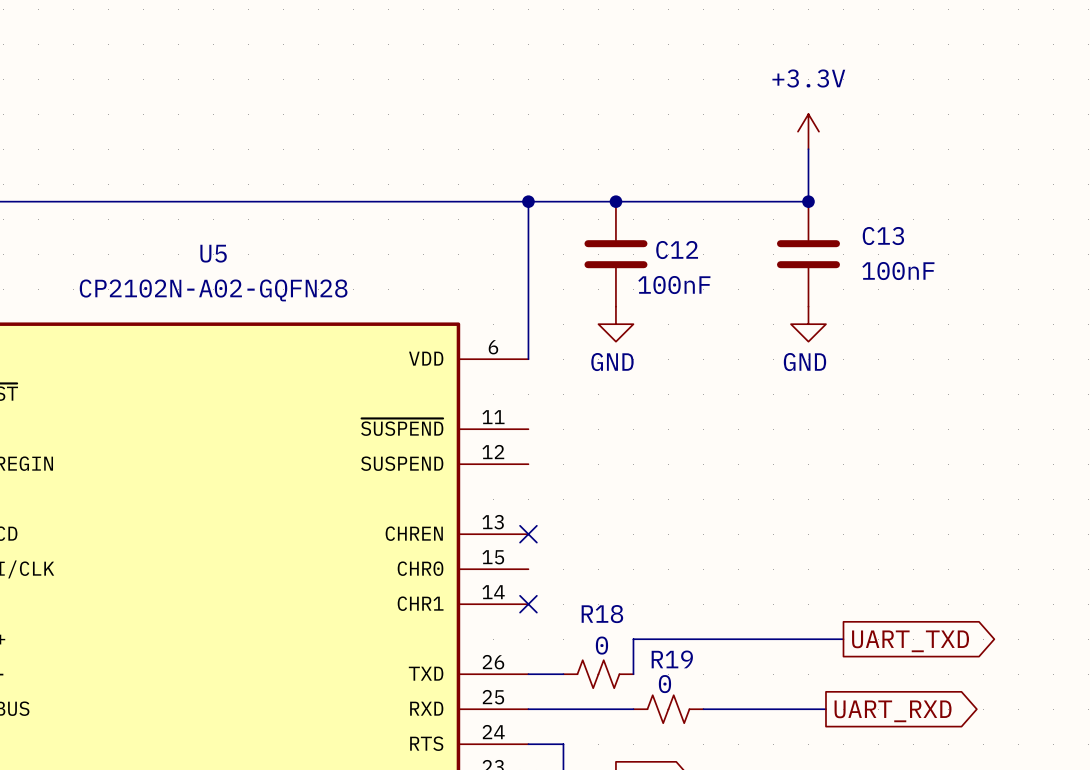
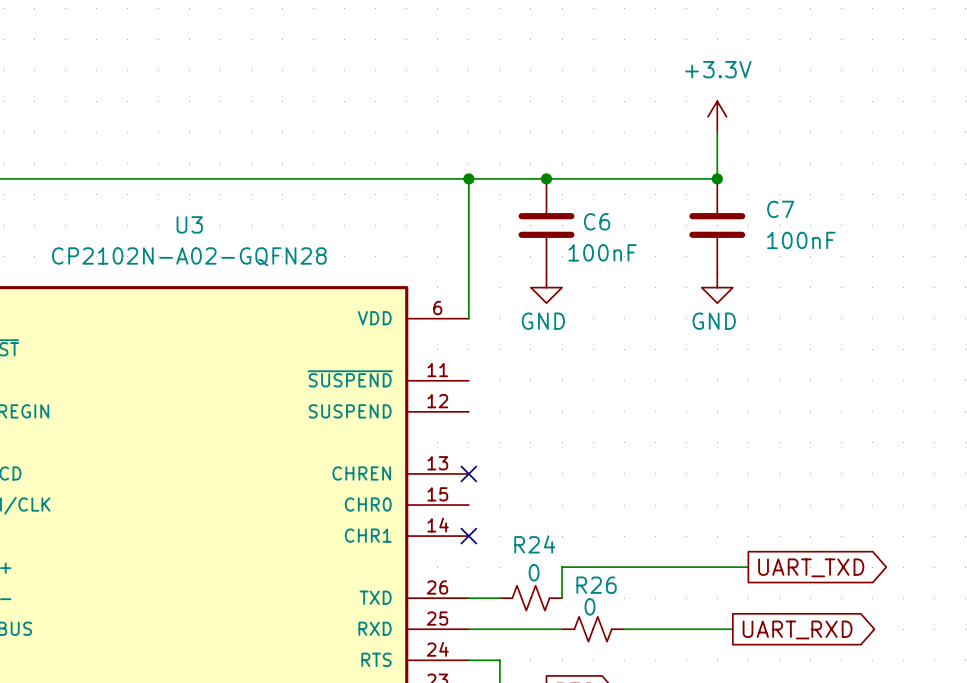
C13 name: C13 (883, 236) -> C7 (780, 209)
C12 name: C12 (677, 250) -> C6 (597, 221)
U5 name: U5 (213, 253) -> U3 (189, 224)
R18 name: R18 (602, 614) -> R24 (534, 544)
R19 name: R19 (672, 659) -> R26 (596, 585)

